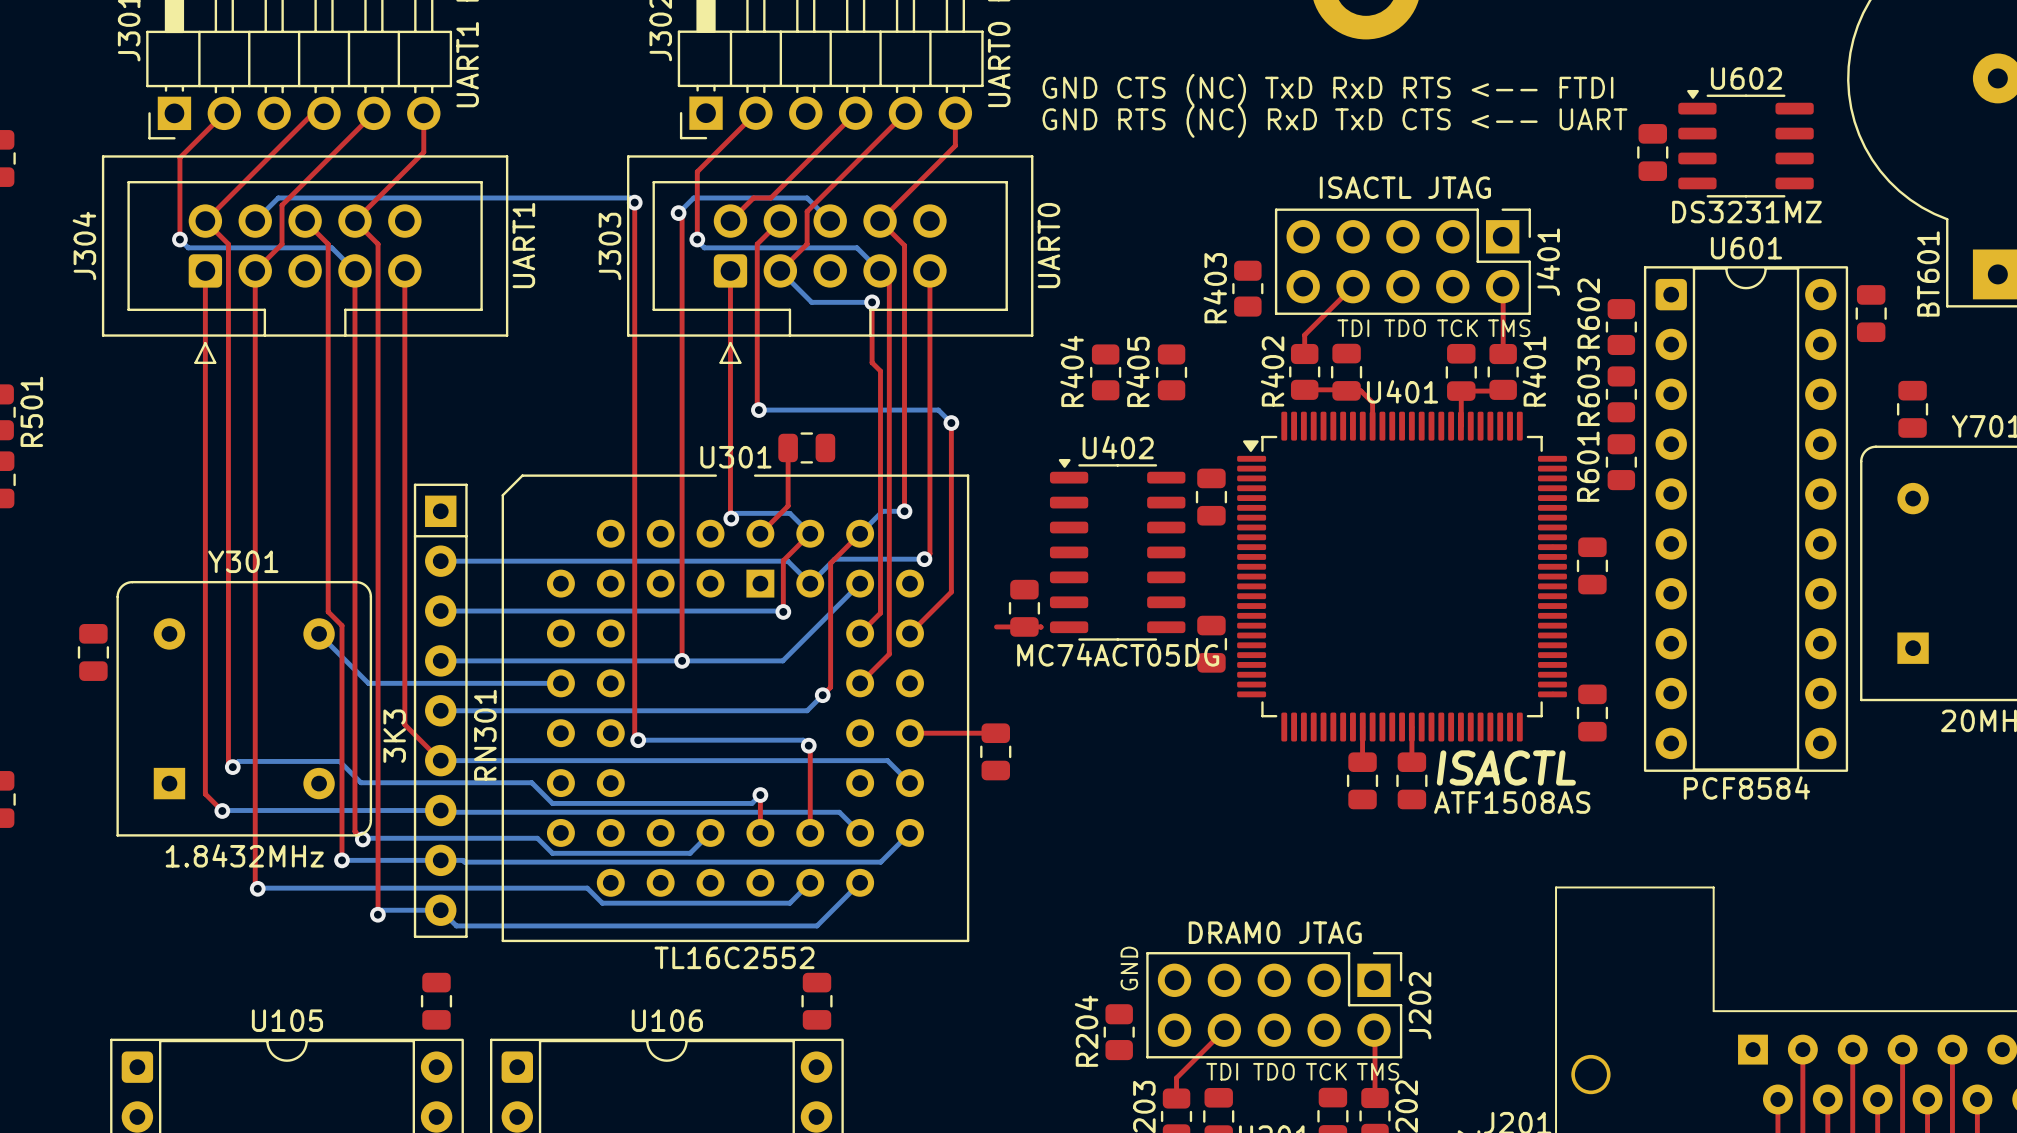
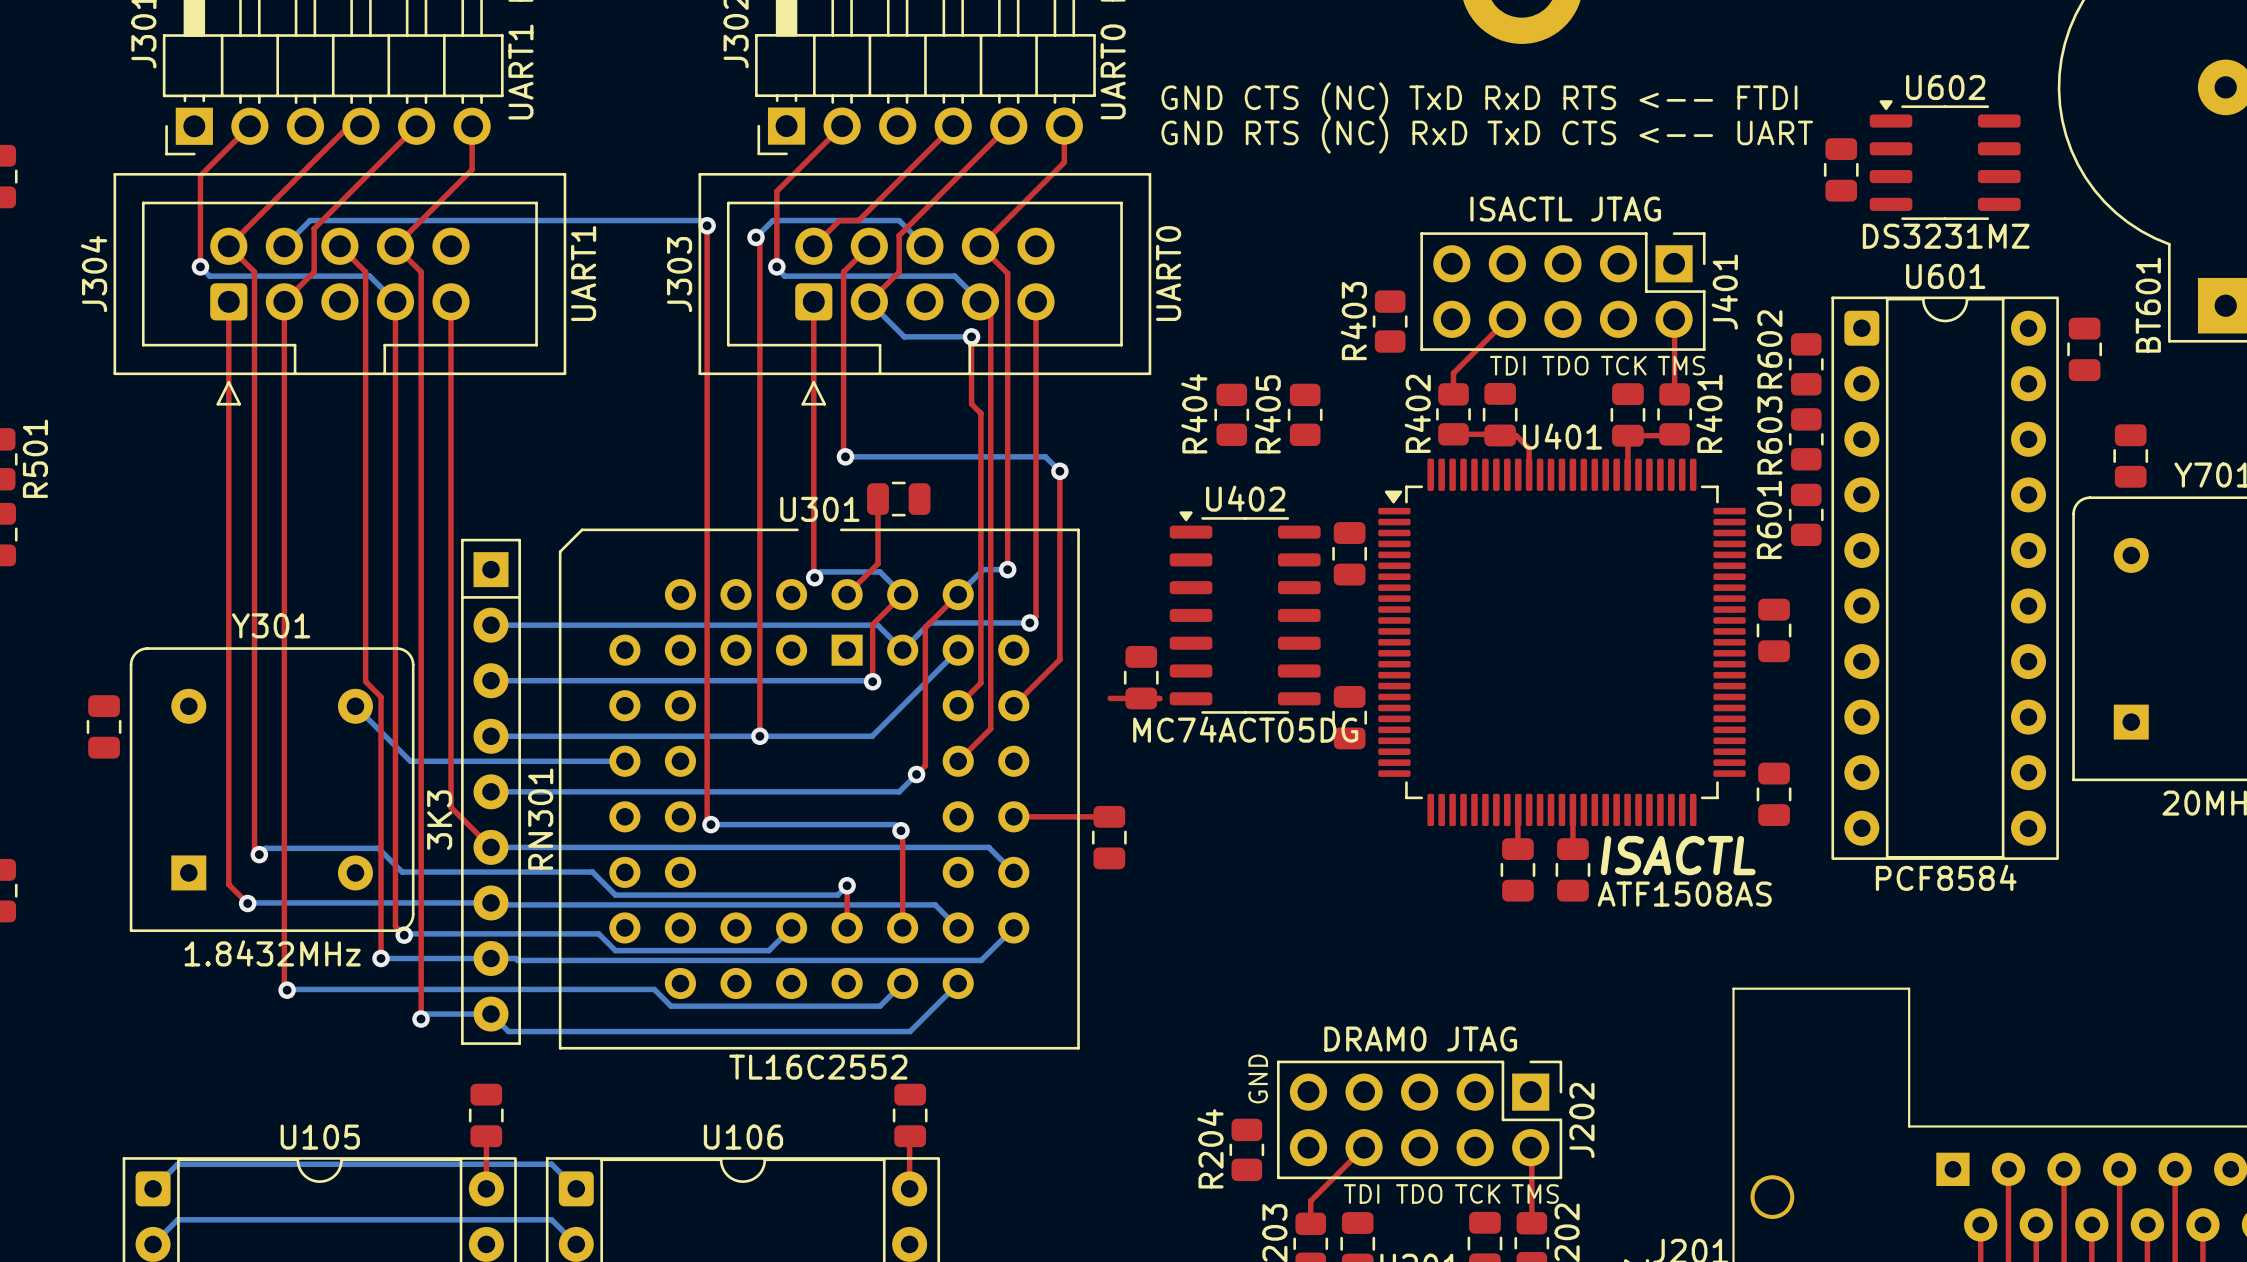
top track: none -> (486, 1136) (486, 1188)
top track: none -> (910, 1136) (909, 1188)
bottom track: none -> (153, 1188) (177, 1164) (551, 1164) (576, 1188)
bottom track: none -> (153, 1244) (177, 1219) (551, 1219) (576, 1244)

